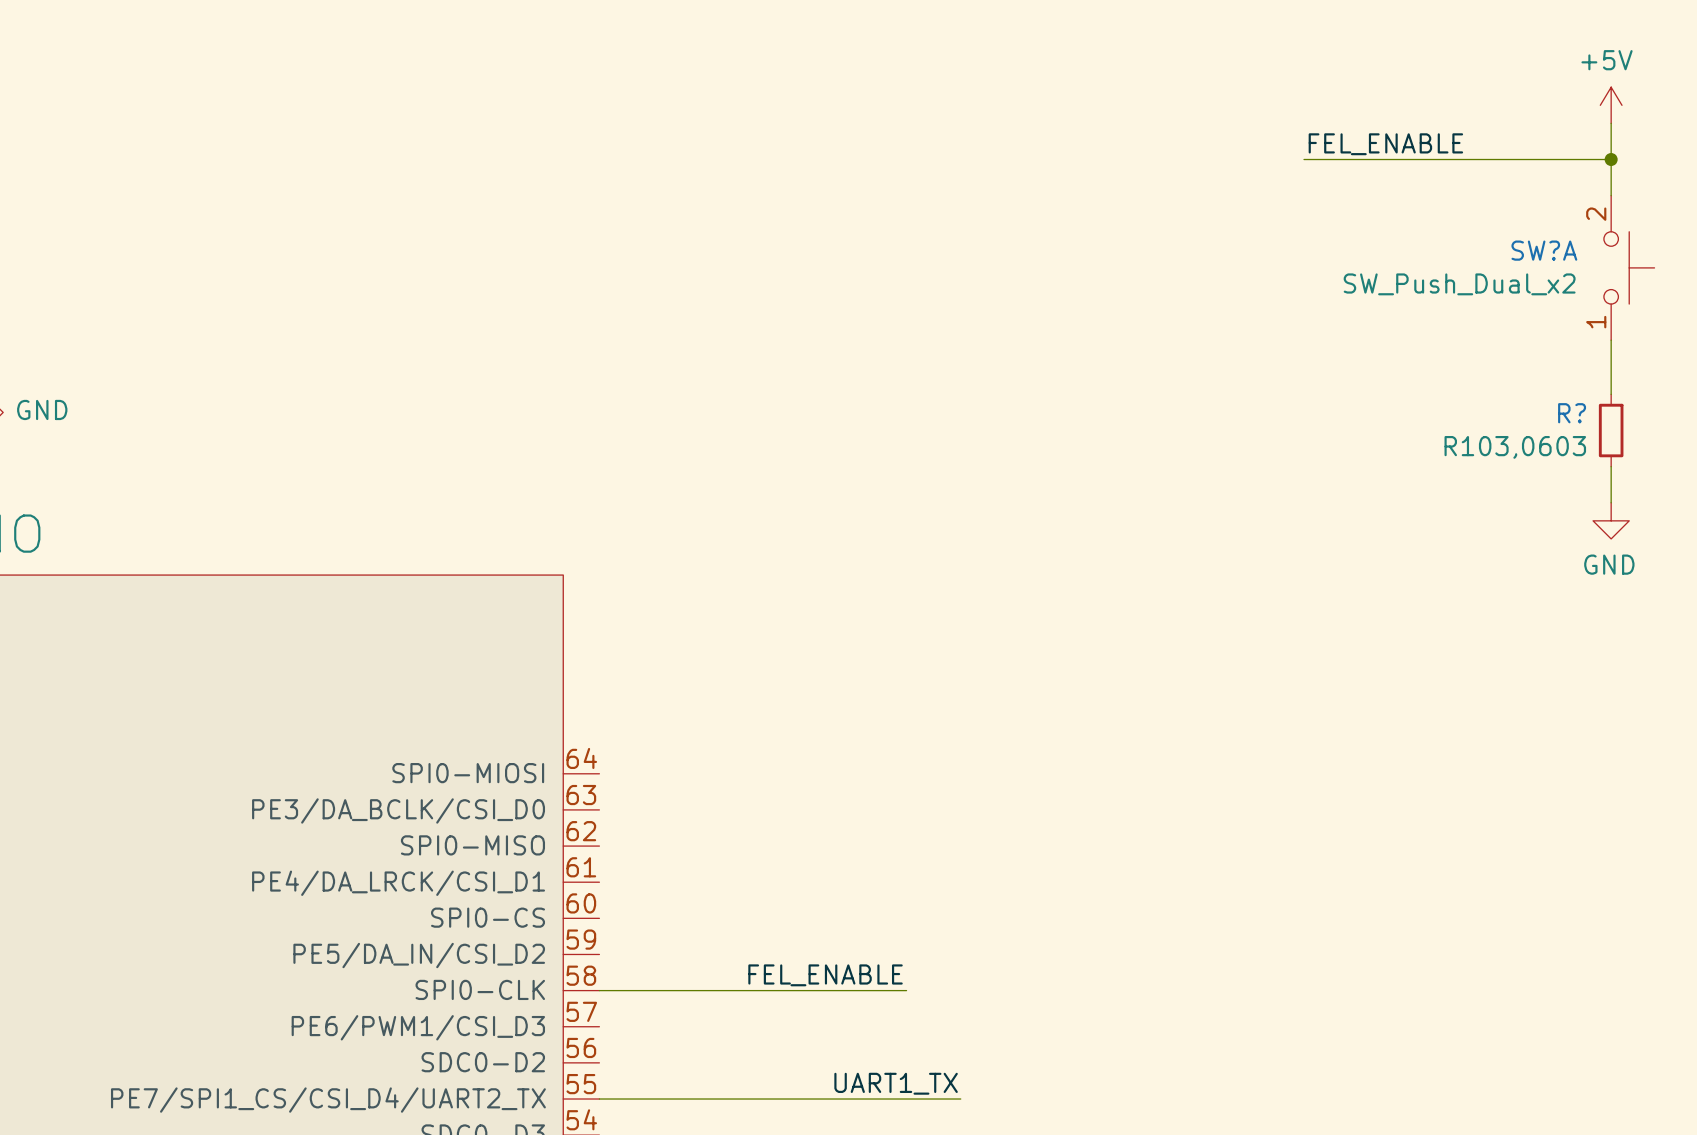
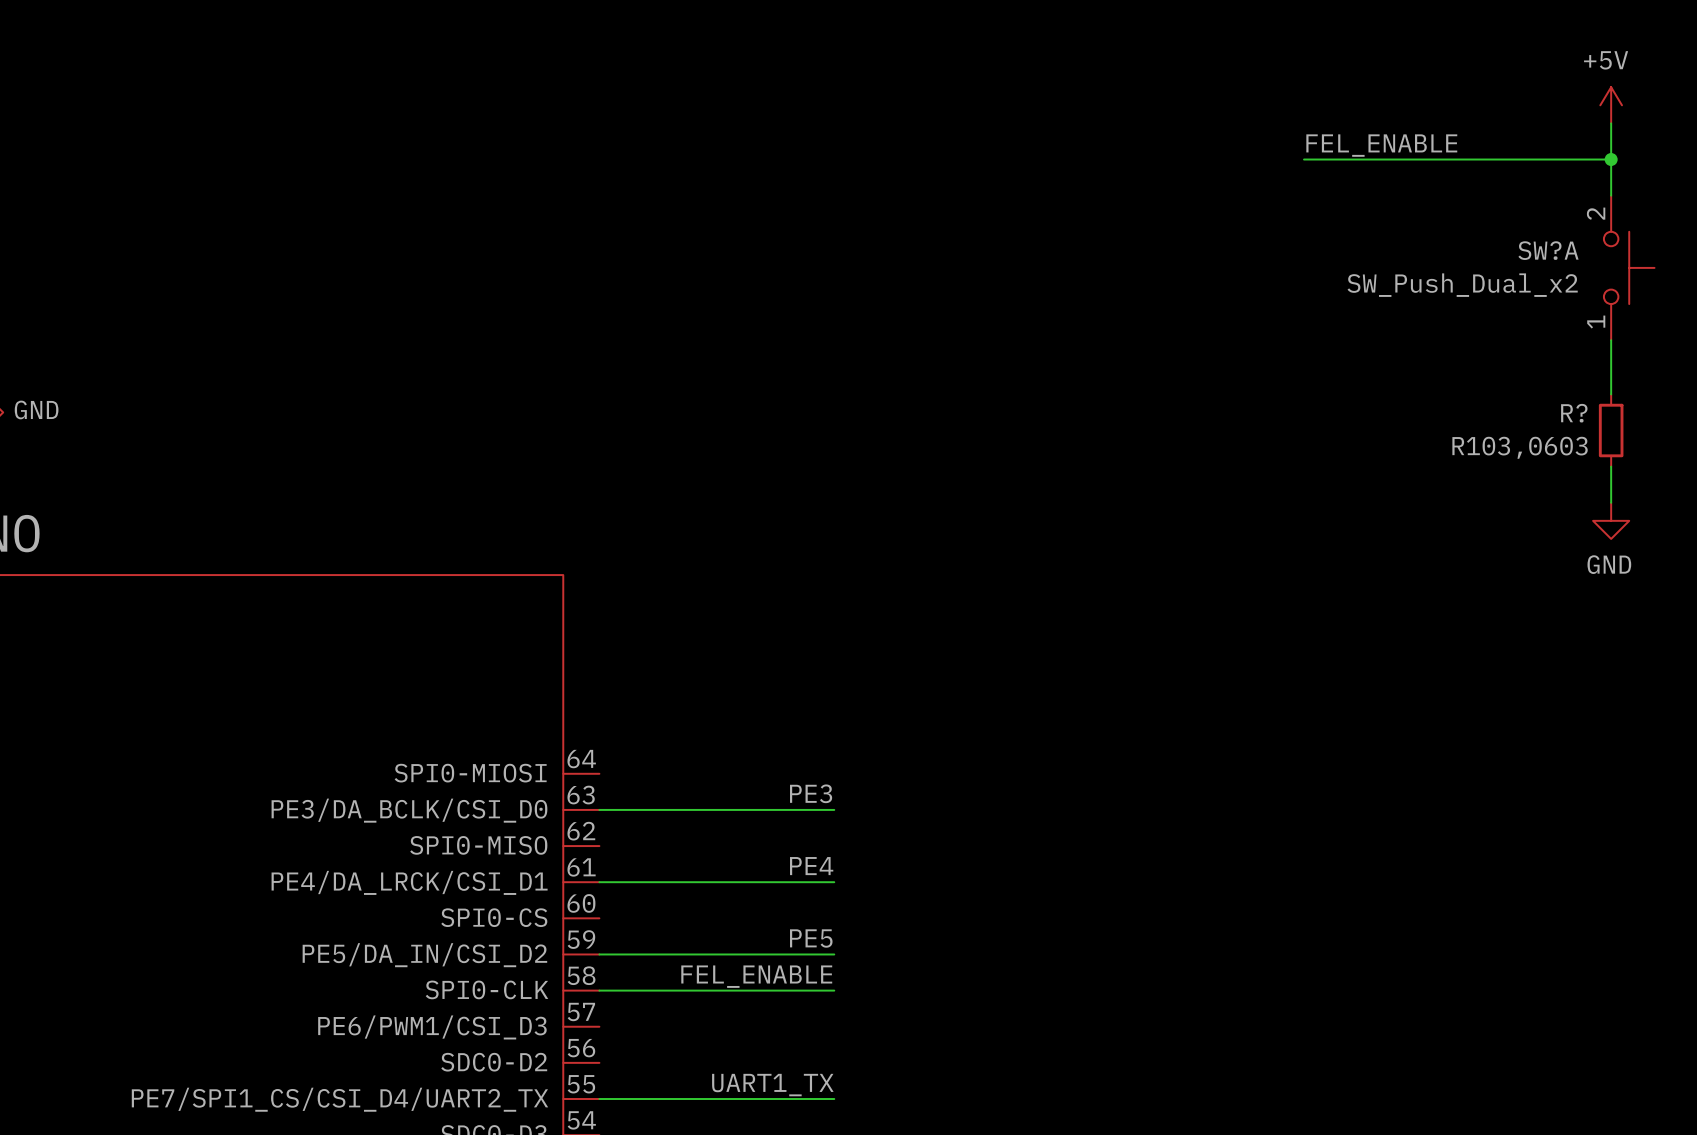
label: none -> PE3 (811, 793)
wire: none -> (599, 809) (834, 809)
label: none -> PE4 (811, 866)
wire: none -> (599, 882) (834, 882)
label: none -> PE5 (811, 938)
wire: none -> (599, 954) (834, 954)
label position: FEL_ENABLE (825, 975) -> FEL_ENABLE (756, 976)
wire: (834, 990) (906, 990) -> none
label position: UART1_TX (896, 1083) -> UART1_TX (772, 1085)
wire: (834, 1099) (960, 1099) -> none

